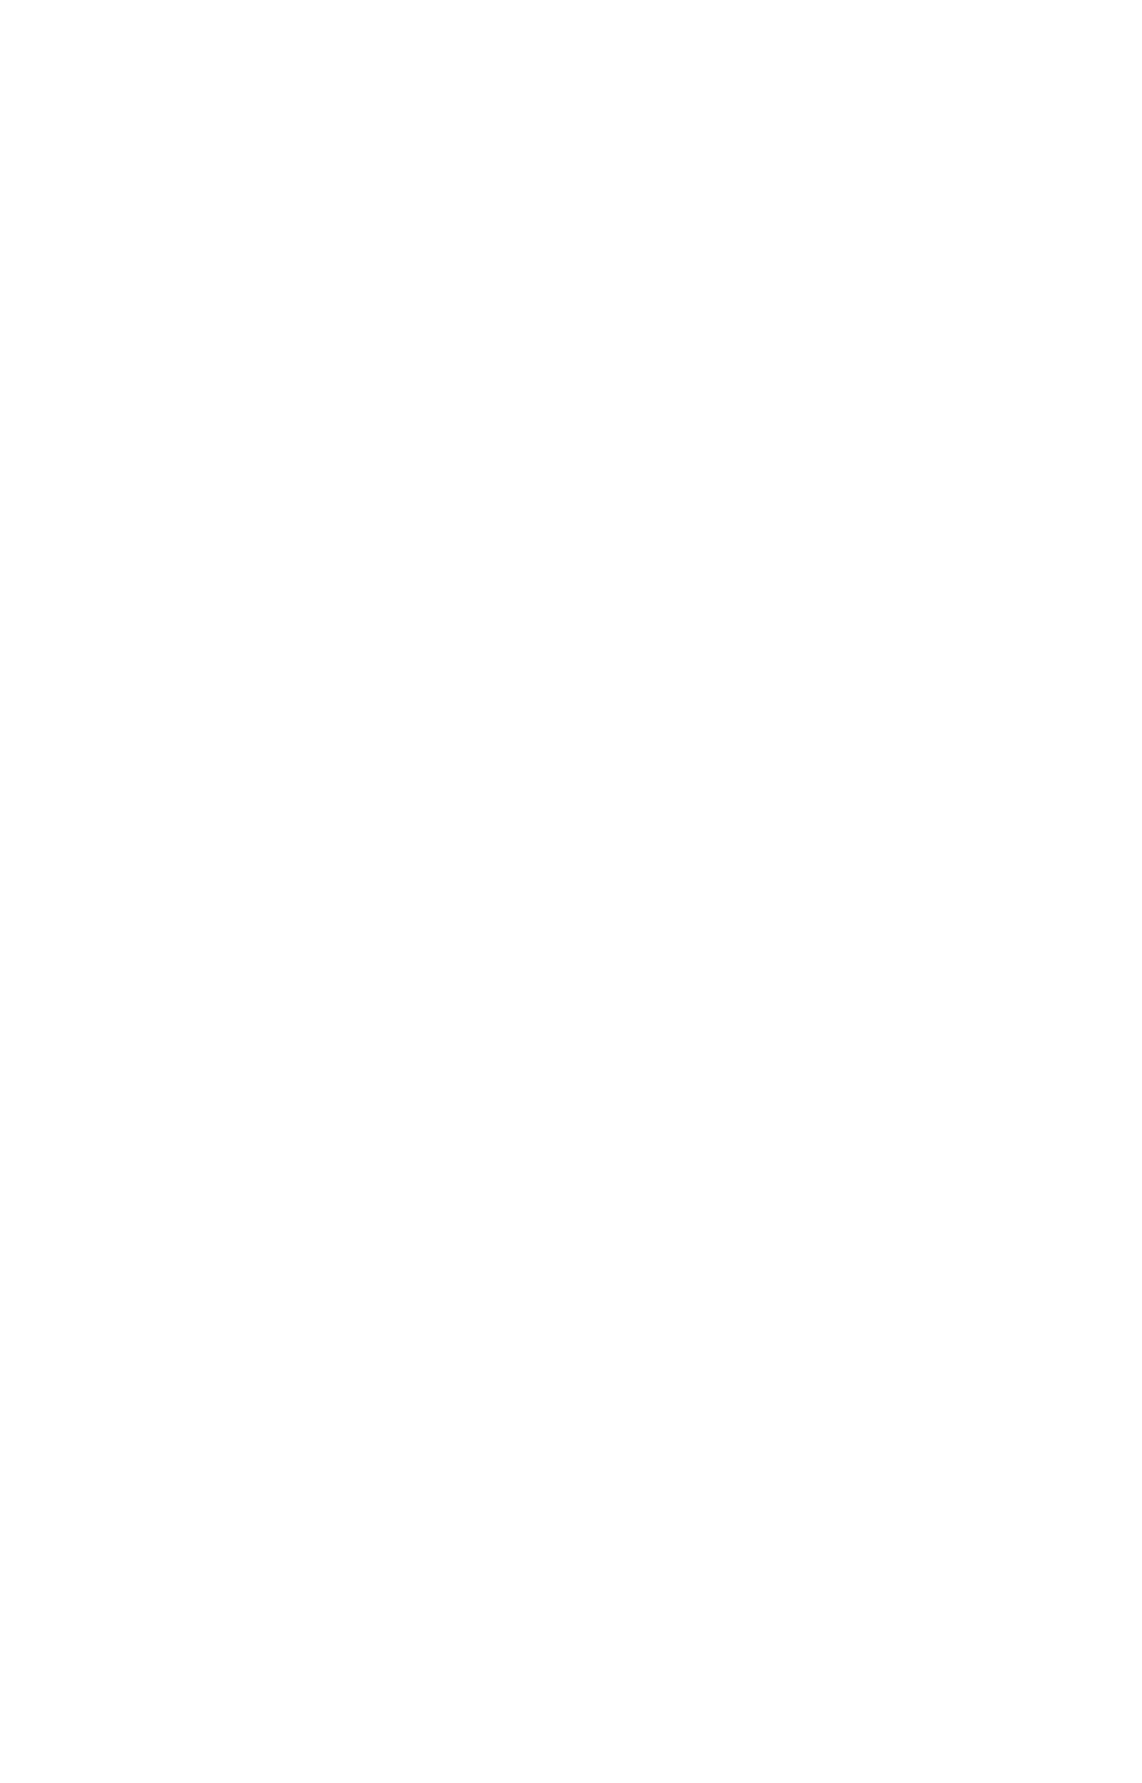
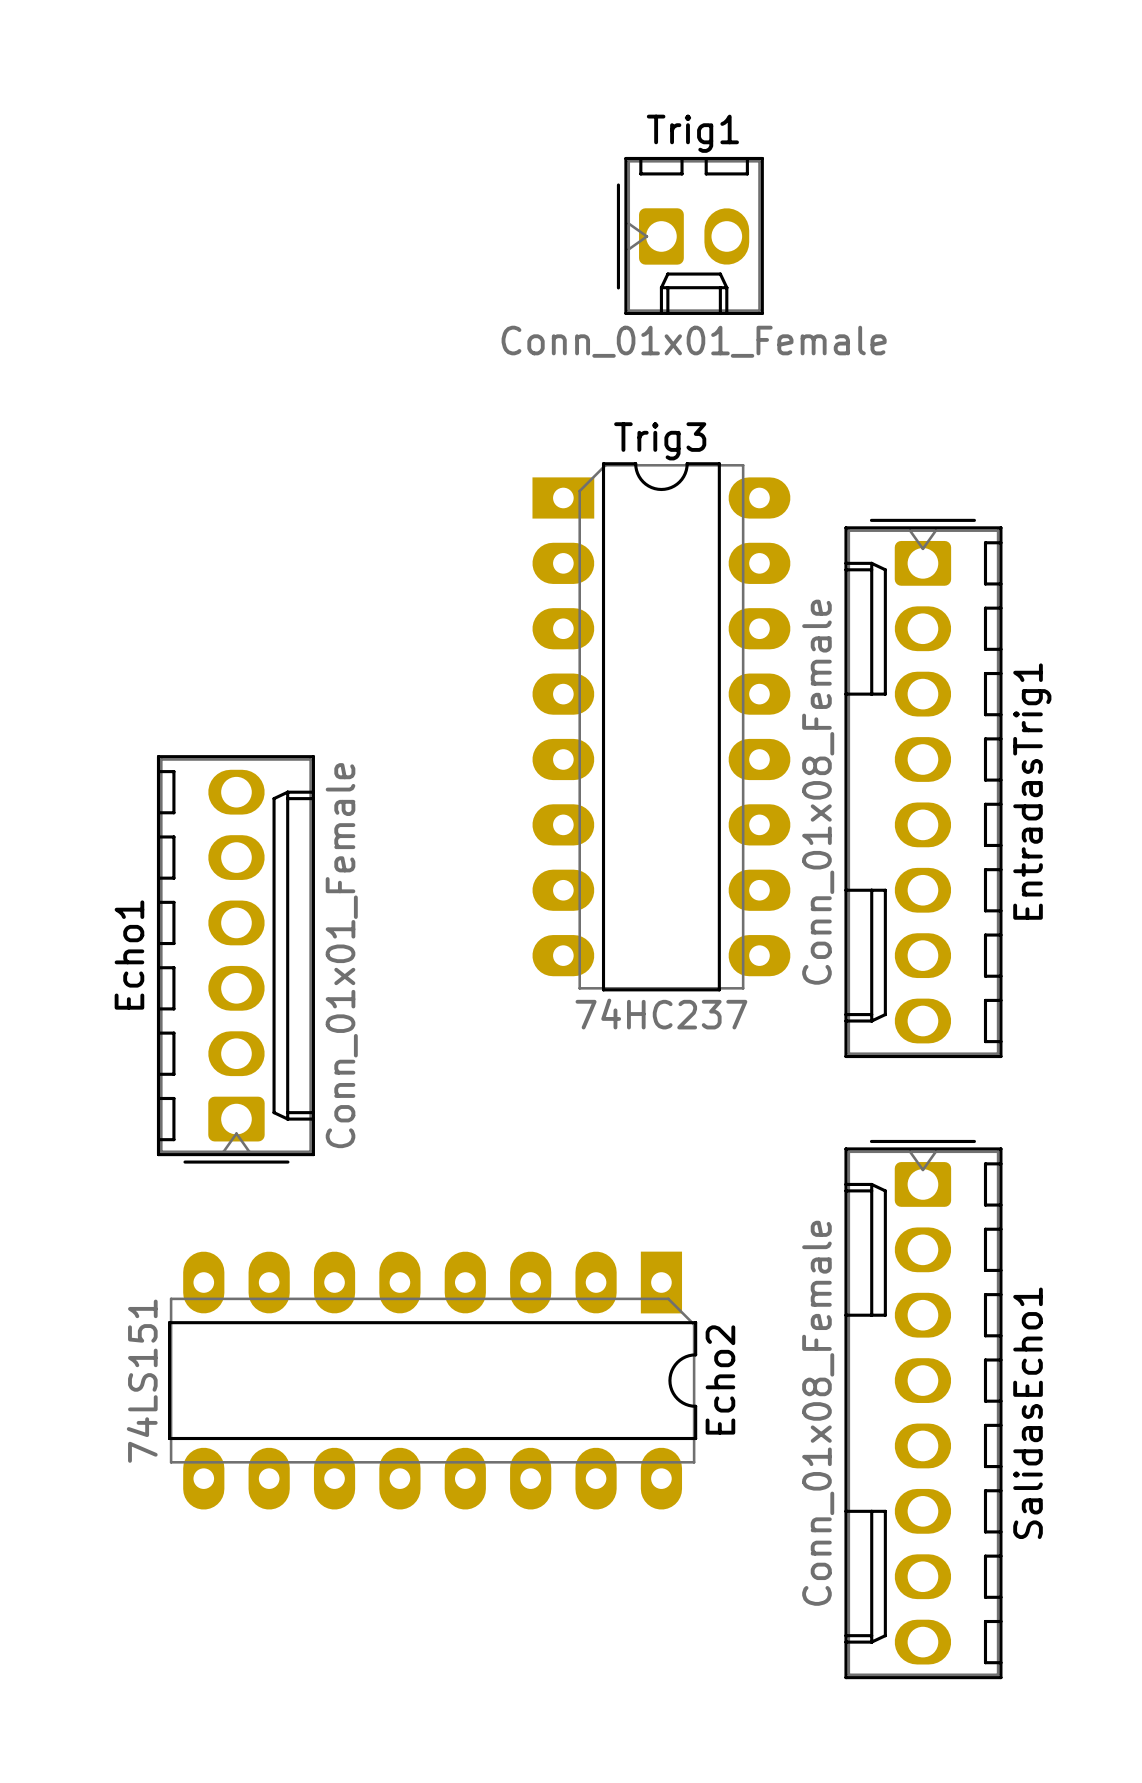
Trig1: none -> Conn_01x01_Female (690, 235)
Trig3: none -> 74HC237 (661, 726)
EntradasTrig1: none -> Conn_01x08_Female (923, 788)
Echo1: none -> Conn_01x01_Female (235, 959)
Echo2: none -> 74LS151 (432, 1380)
SalidasEcho1: none -> Conn_01x08_Female (923, 1409)

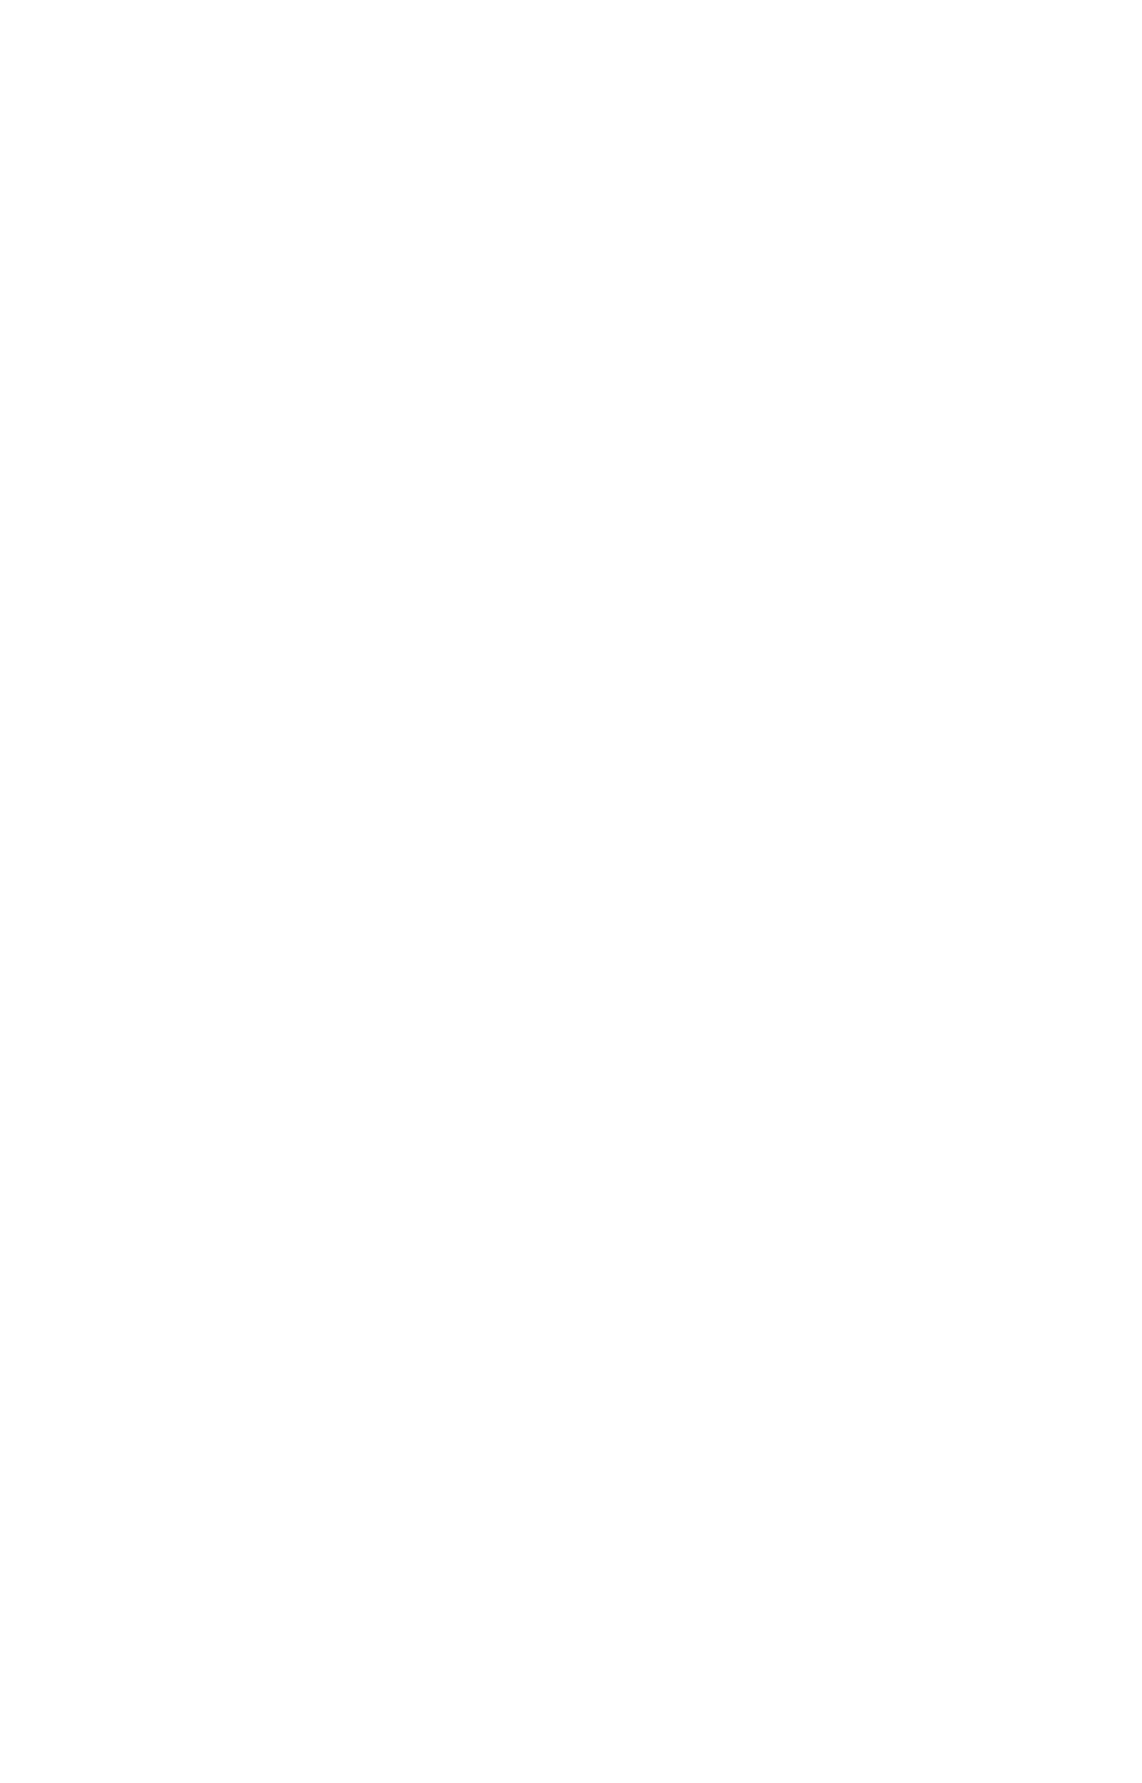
Trig1: Conn_01x01_Female (690, 235) -> none
Trig3: 74HC237 (661, 726) -> none
EntradasTrig1: Conn_01x08_Female (923, 788) -> none
Echo1: Conn_01x01_Female (235, 959) -> none
Echo2: 74LS151 (432, 1380) -> none
SalidasEcho1: Conn_01x08_Female (923, 1409) -> none

